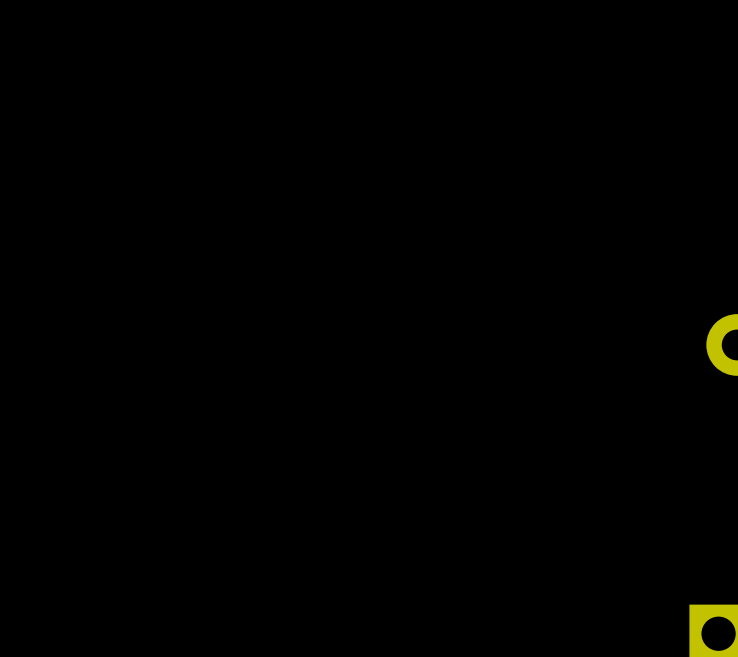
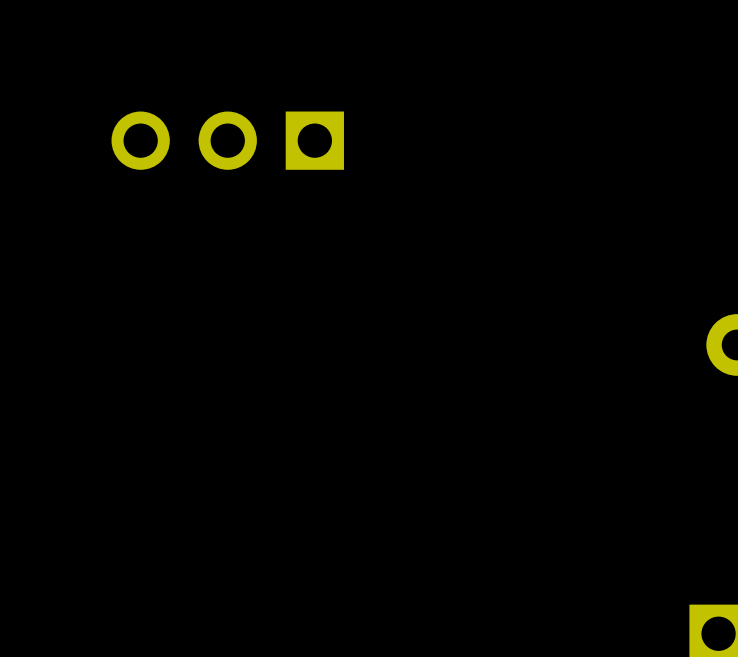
part: none -> (227, 140)

